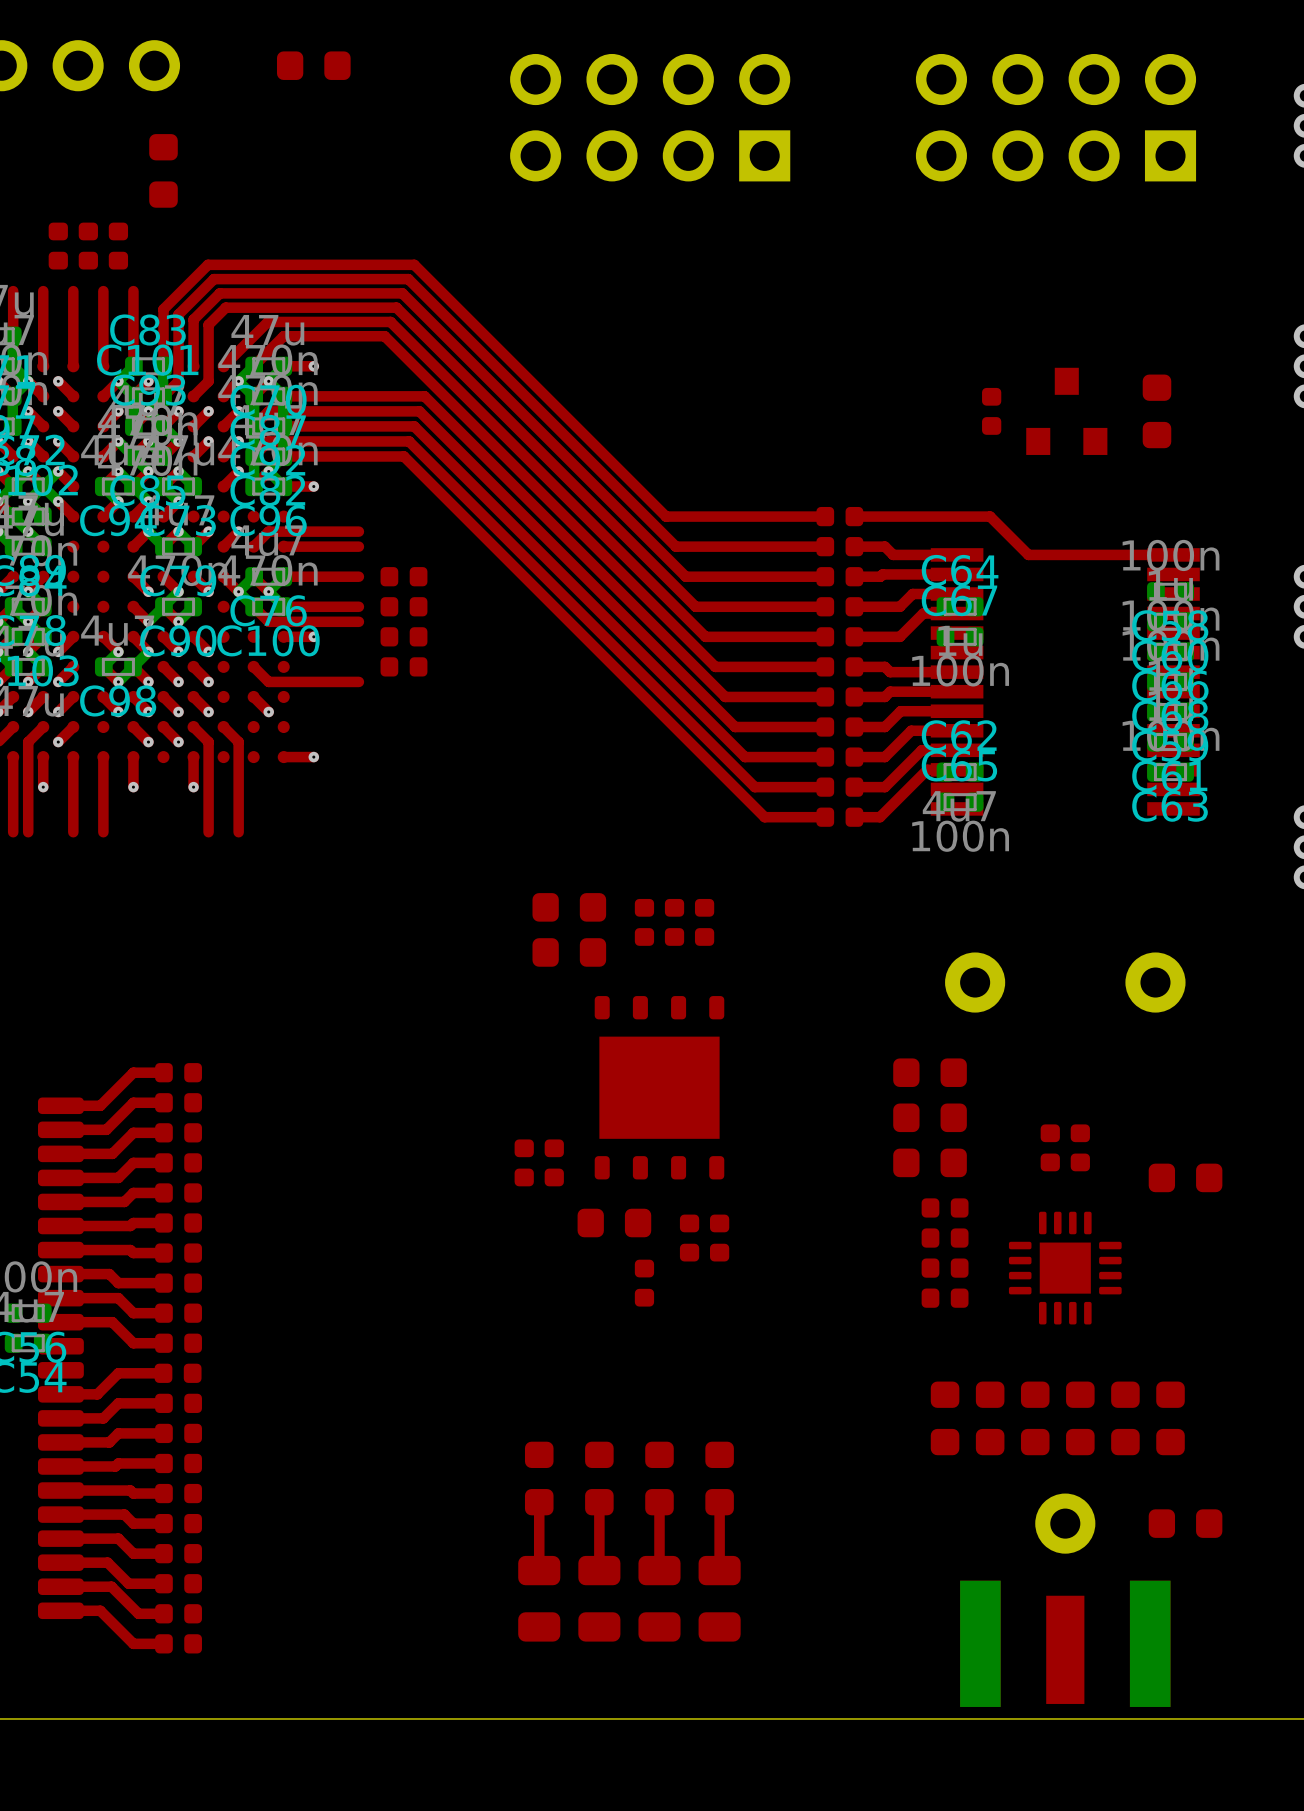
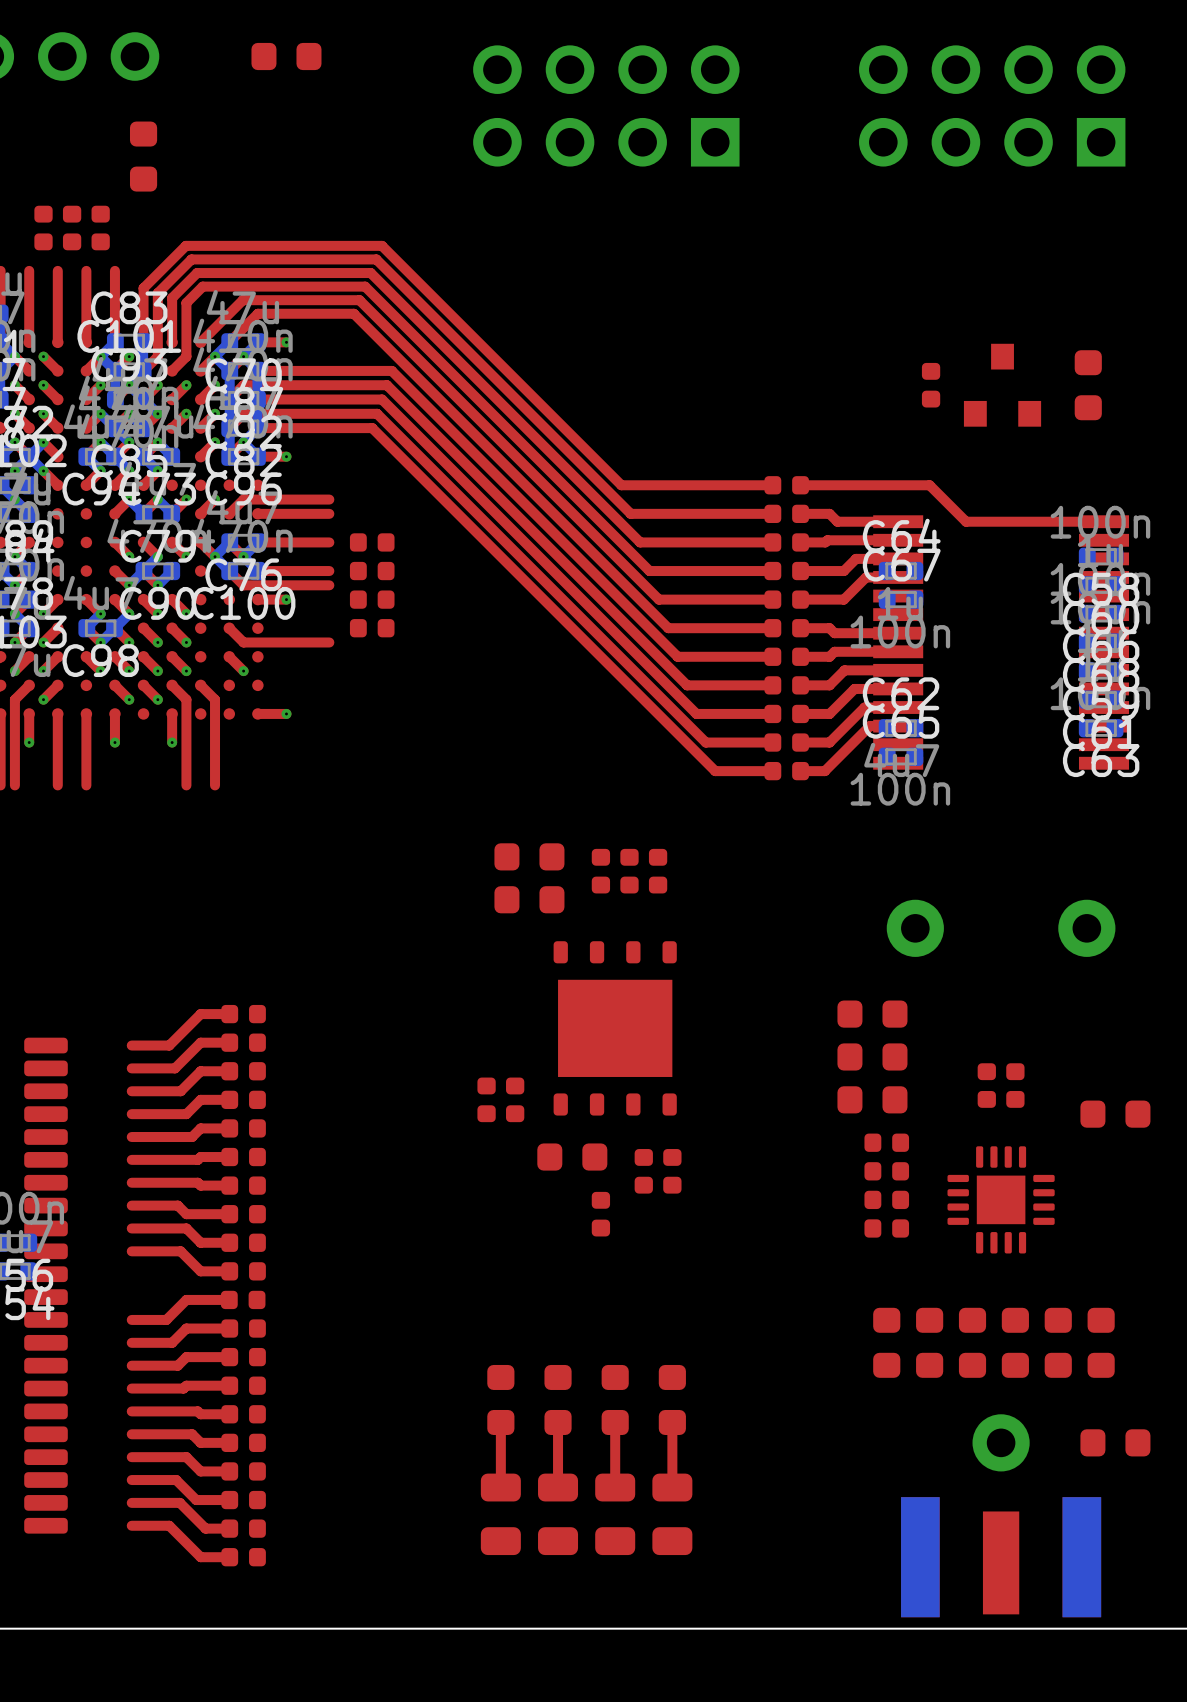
top track: (163, 1072) (133, 1072) (100, 1105) (60, 1105) -> (229, 1014) (200, 1014) (169, 1045) (131, 1045)
part: (178, 1072) -> none
part: none -> (243, 1014)
top track: (163, 1102) (133, 1102) (106, 1129) (60, 1129) -> (229, 1042) (200, 1042) (174, 1068) (131, 1068)
part: (178, 1102) -> none
part: none -> (243, 1042)
top track: (163, 1132) (133, 1132) (112, 1153) (60, 1153) -> (229, 1071) (200, 1071) (180, 1091) (131, 1091)
part: (178, 1132) -> none
part: none -> (243, 1071)
top track: (163, 1162) (133, 1162) (118, 1177) (60, 1177) -> (229, 1099) (200, 1099) (186, 1114) (131, 1114)
part: (178, 1162) -> none
part: none -> (243, 1099)
top track: (163, 1192) (133, 1192) (124, 1201) (60, 1201) -> (229, 1128) (200, 1128) (192, 1137) (131, 1137)
part: (178, 1192) -> none
part: none -> (243, 1128)
top track: (163, 1223) (133, 1223) (130, 1226) (60, 1226) -> (229, 1157) (200, 1157) (197, 1159) (131, 1159)
part: (178, 1223) -> none
part: none -> (243, 1157)
top track: (60, 1250) (130, 1250) (133, 1253) (163, 1253) -> (131, 1182) (197, 1182) (200, 1185) (229, 1185)
part: (178, 1253) -> none
part: none -> (243, 1185)
top track: (60, 1274) (109, 1274) (118, 1283) (163, 1283) -> (131, 1205) (177, 1205) (186, 1214) (229, 1214)
part: (178, 1283) -> none
part: none -> (243, 1214)
top track: (60, 1298) (118, 1298) (133, 1313) (163, 1313) -> (131, 1228) (186, 1228) (200, 1242) (229, 1242)
part: (178, 1313) -> none
part: none -> (243, 1242)
top track: (60, 1322) (112, 1322) (133, 1343) (163, 1343) -> (131, 1251) (180, 1251) (200, 1271) (229, 1271)
part: (178, 1343) -> none
part: none -> (243, 1271)
top track: (163, 1373) (118, 1373) (97, 1394) (60, 1394) -> (229, 1299) (186, 1299) (166, 1319) (131, 1319)
part: (178, 1373) -> none
part: none -> (243, 1299)
top track: (163, 1403) (118, 1403) (103, 1418) (60, 1418) -> (229, 1328) (186, 1328) (172, 1342) (131, 1342)
part: (178, 1403) -> none
part: none -> (243, 1328)
top track: (163, 1433) (118, 1433) (109, 1442) (60, 1442) -> (229, 1357) (186, 1357) (177, 1365) (131, 1365)
part: (178, 1433) -> none
part: none -> (243, 1357)
top track: (163, 1463) (118, 1463) (115, 1466) (60, 1466) -> (229, 1385) (186, 1385) (183, 1388) (131, 1388)
part: (178, 1463) -> none
part: none -> (243, 1385)
top track: (60, 1490) (130, 1490) (133, 1493) (163, 1493) -> (131, 1411) (197, 1411) (200, 1414) (229, 1414)
part: (178, 1493) -> none
part: none -> (243, 1414)
top track: (60, 1514) (124, 1514) (133, 1523) (163, 1523) -> (131, 1434) (192, 1434) (200, 1442) (229, 1442)
part: (178, 1523) -> none
part: none -> (243, 1442)
top track: (60, 1538) (118, 1538) (133, 1553) (163, 1553) -> (131, 1457) (186, 1457) (200, 1471) (229, 1471)
part: (178, 1553) -> none
part: none -> (243, 1471)
top track: (60, 1562) (107, 1562) (128, 1583) (163, 1583) -> (131, 1480) (176, 1480) (196, 1500) (229, 1500)
part: (178, 1583) -> none
part: none -> (243, 1500)
top track: (60, 1586) (111, 1586) (138, 1613) (163, 1613) -> (131, 1502) (179, 1502) (205, 1528) (229, 1528)
top track: (60, 1610) (100, 1610) (133, 1643) (163, 1643) -> (131, 1525) (169, 1525) (200, 1557) (229, 1557)
part: (178, 1613) -> none
part: none -> (243, 1528)
part: (178, 1643) -> none
part: none -> (243, 1557)

